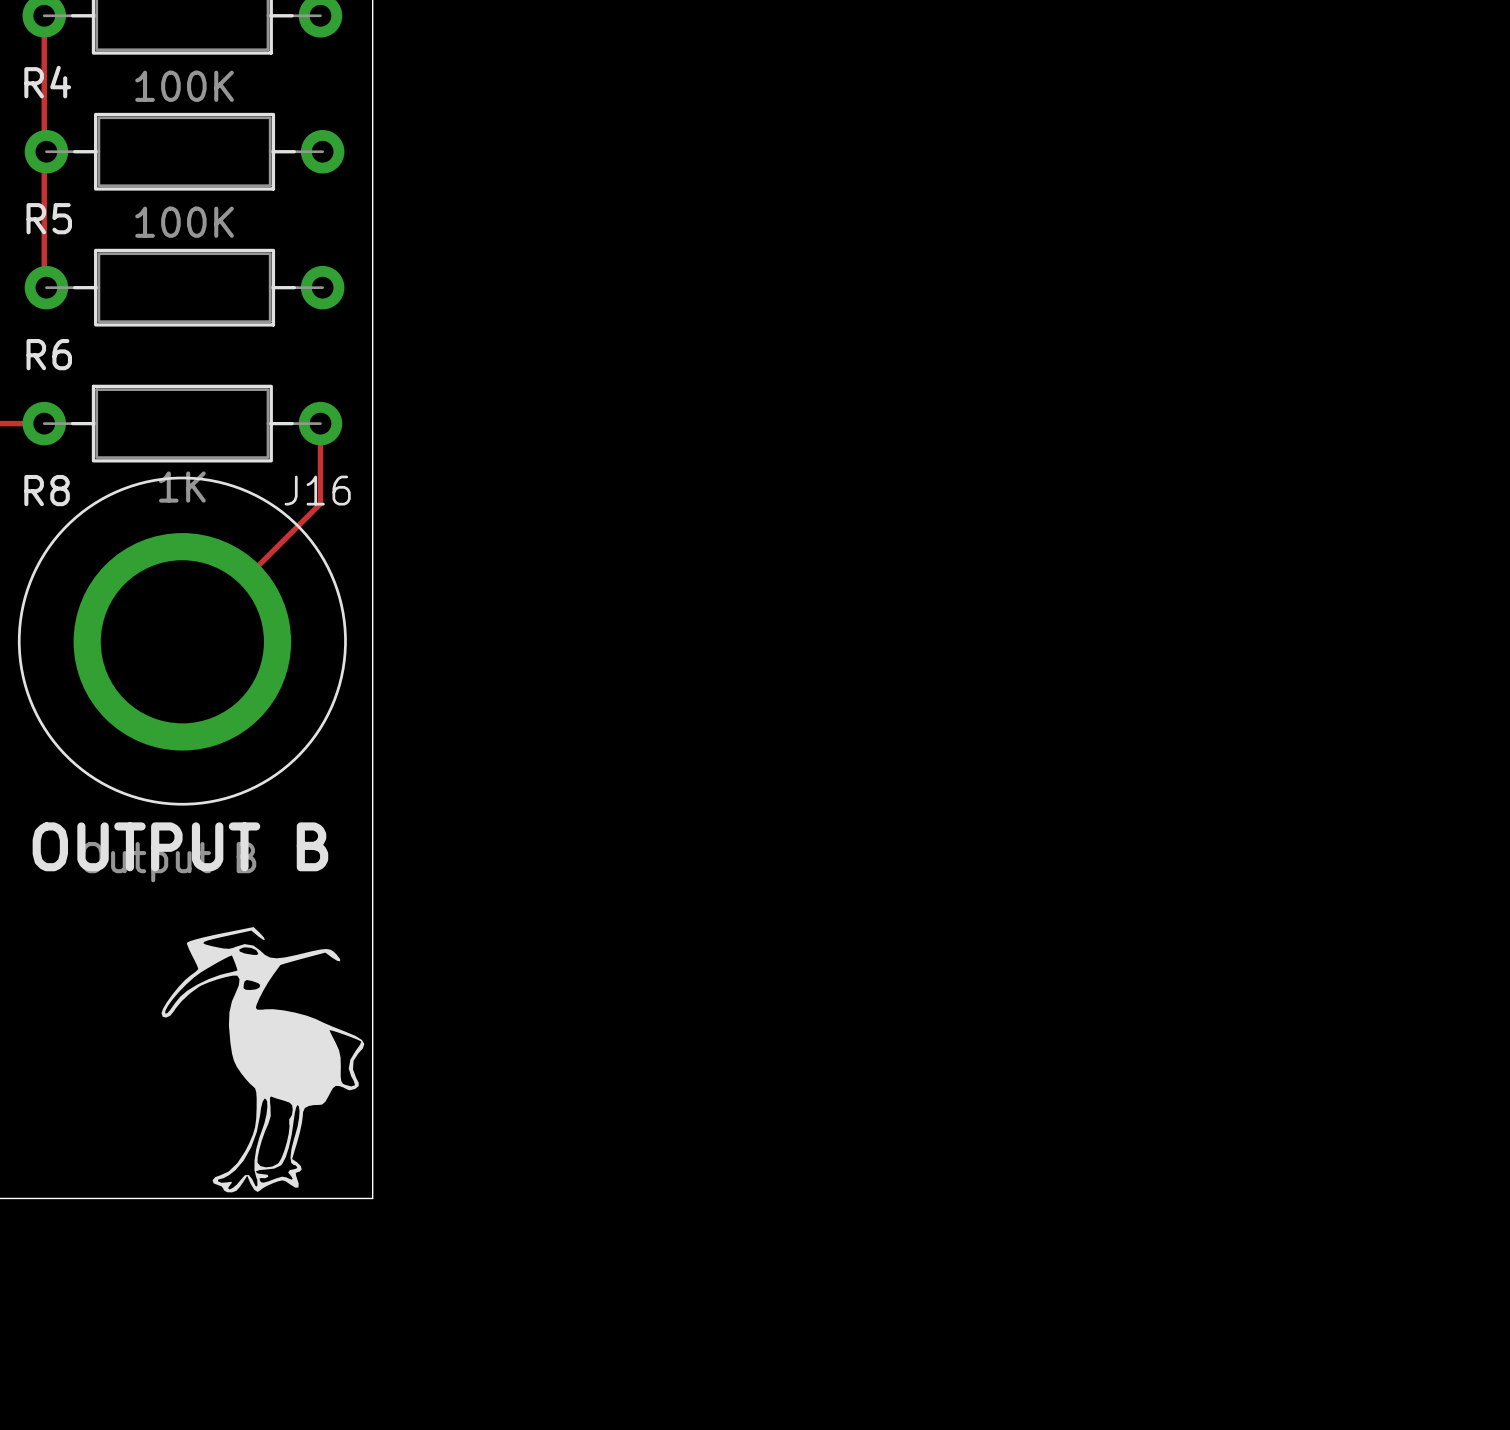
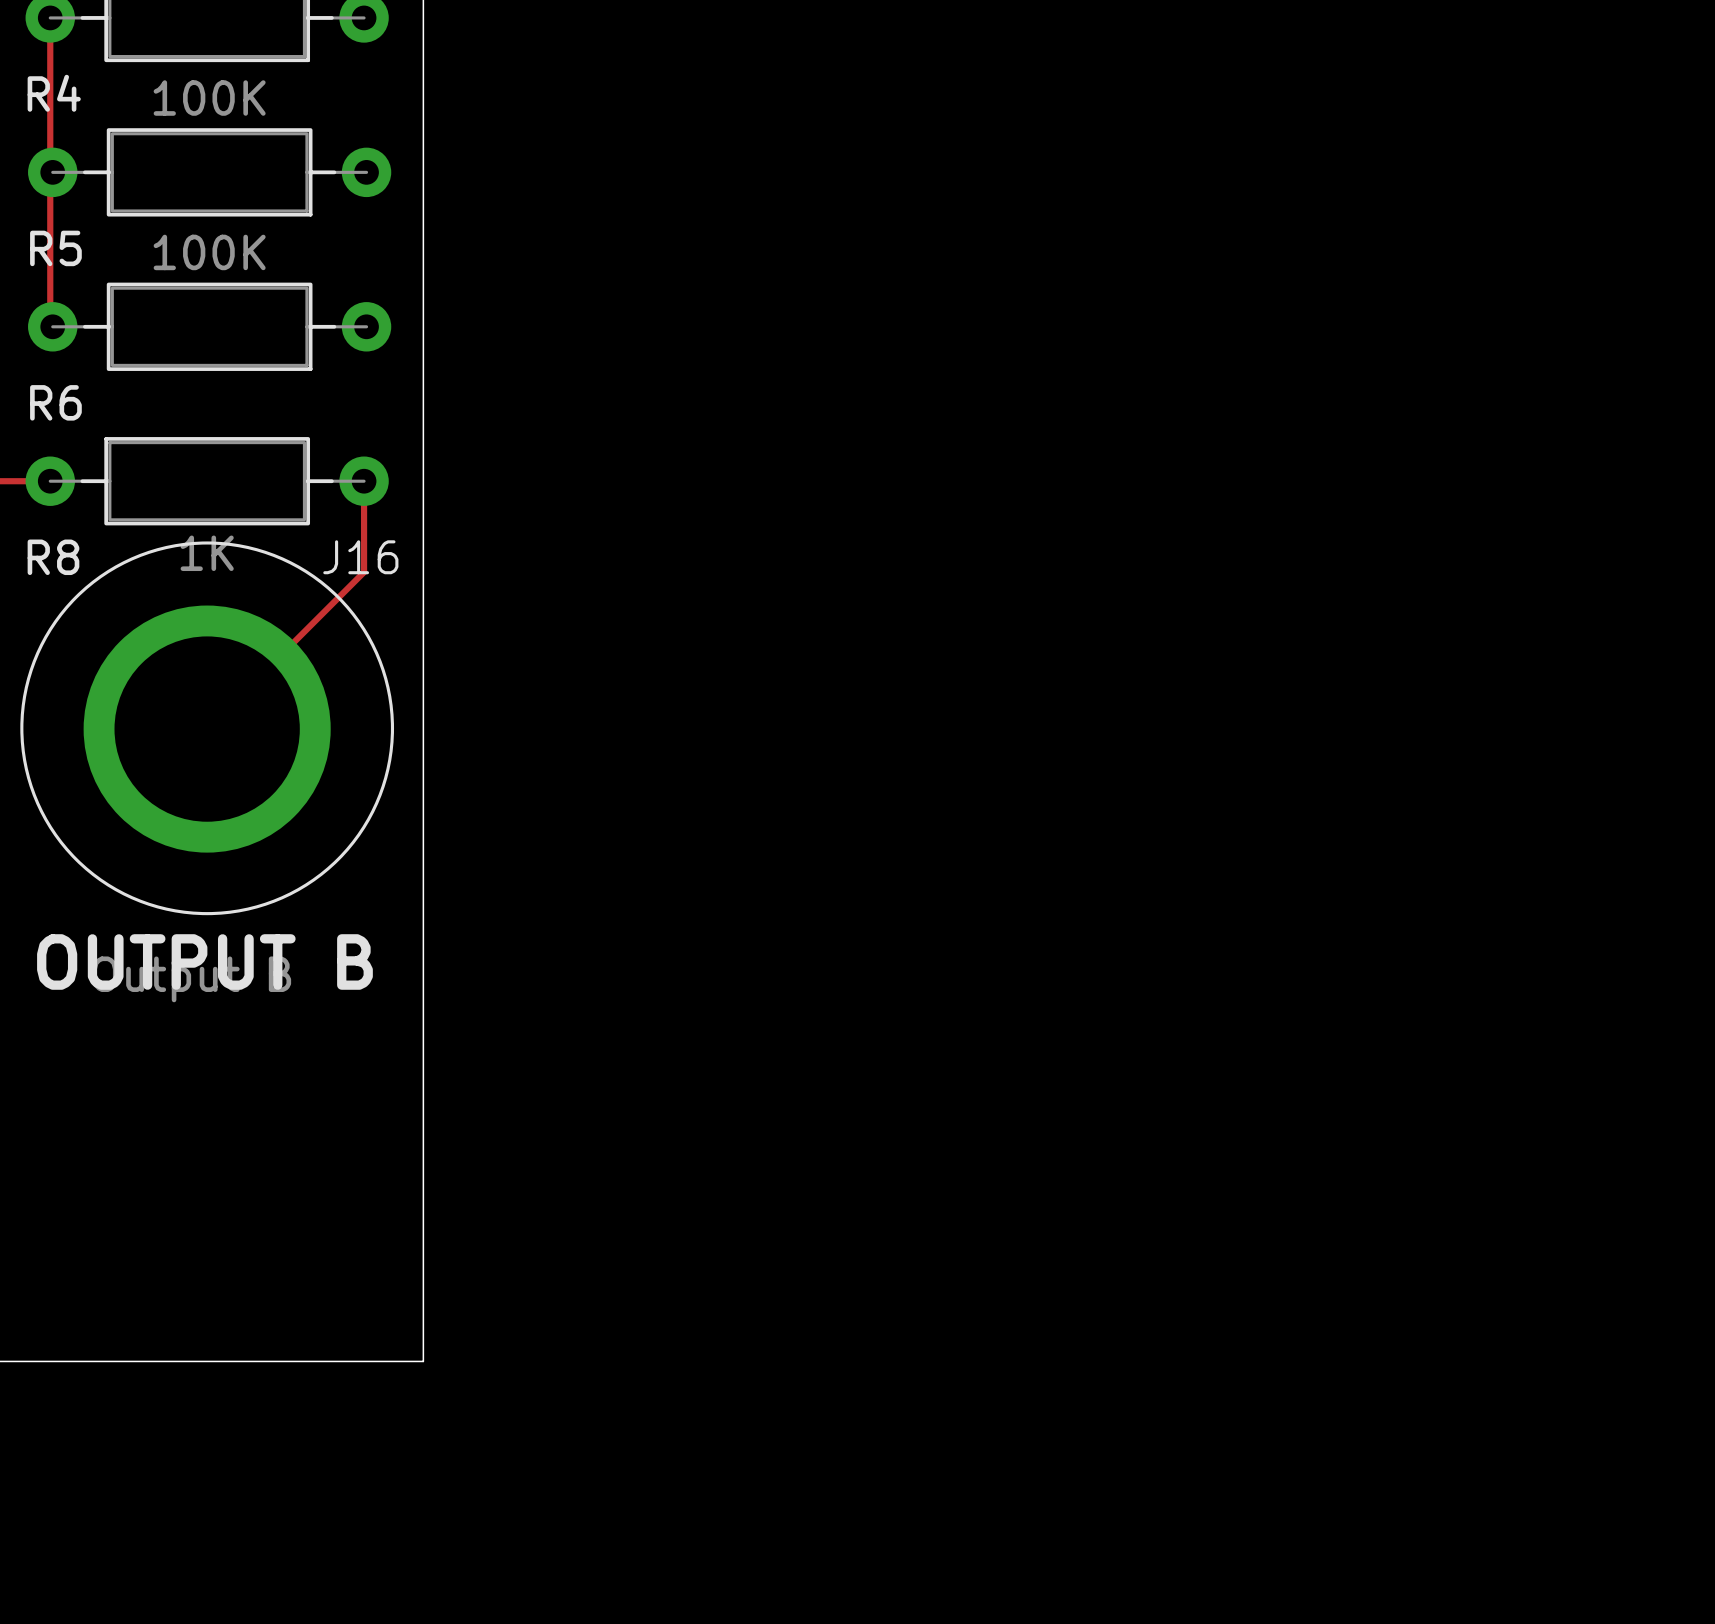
drawing: [161, 927, 365, 1193] -> none

